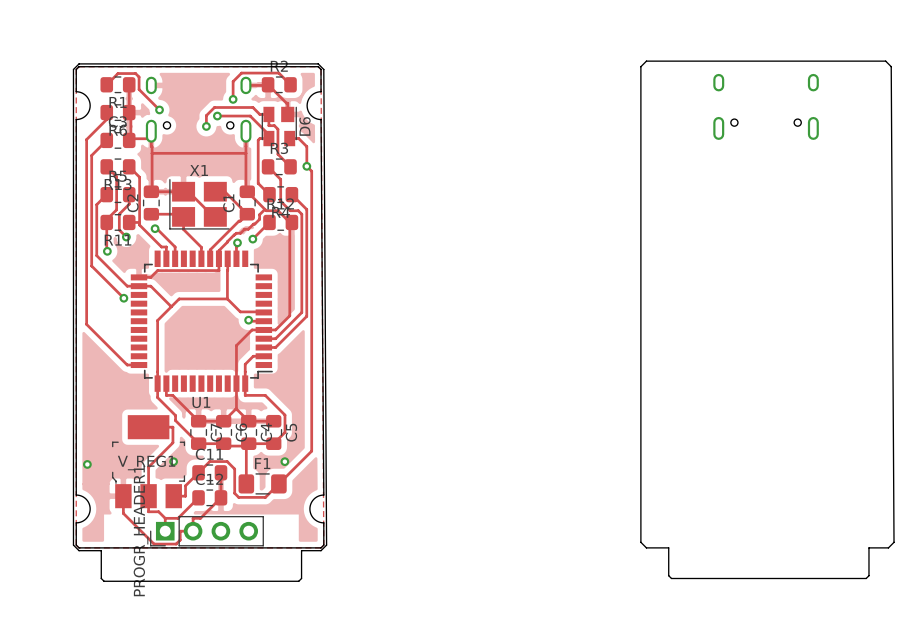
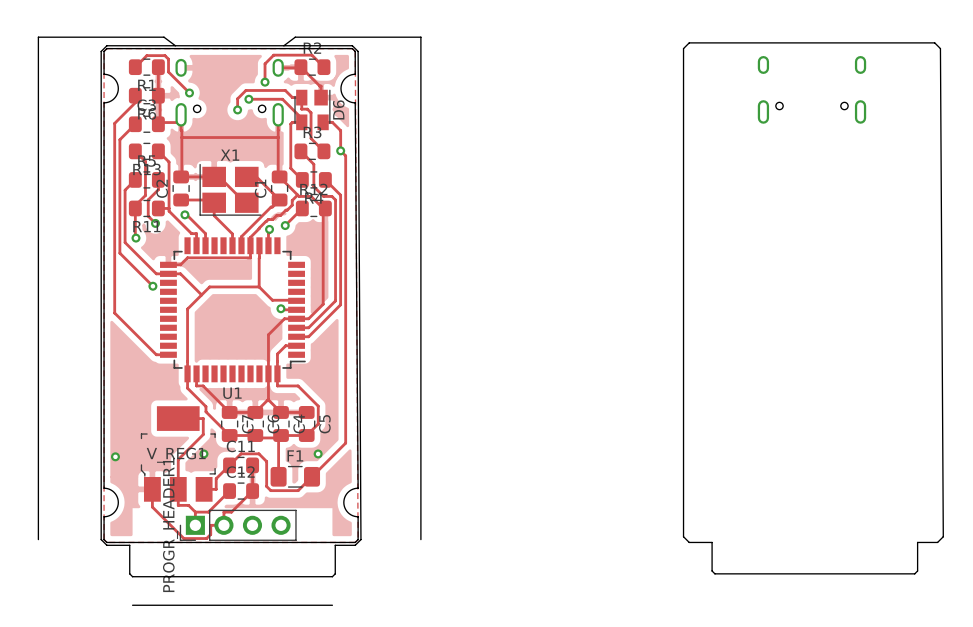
board edge: none -> (175, 45) (163, 37) (38, 37) (38, 539)
board edge: none -> (283, 45) (295, 37) (420, 37) (420, 539)
board edge: none -> (132, 605) (332, 605)

